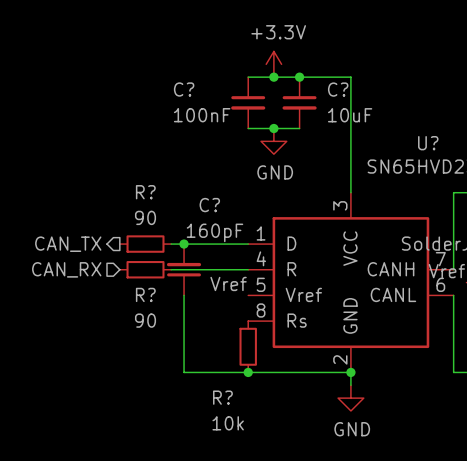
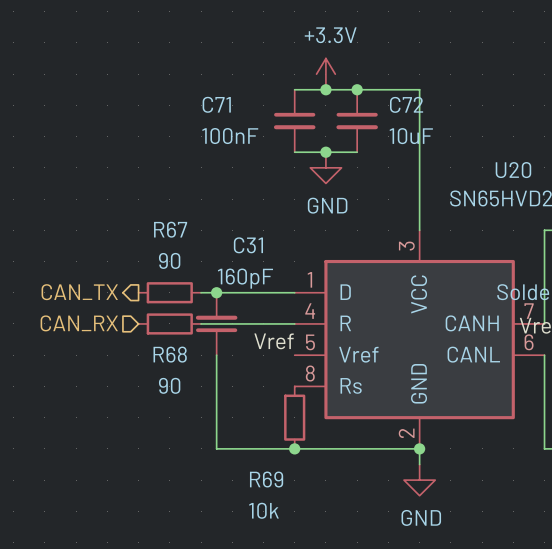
C? name: C? (184, 89) -> C71 (216, 104)
C? name: C? (338, 89) -> C72 (406, 104)
U? name: U? (428, 143) -> U20 (513, 170)
R? name: R? (145, 192) -> R67 (170, 229)
C? name: C? (209, 205) -> C31 (248, 245)
R? name: R? (145, 294) -> R68 (170, 354)
R? name: R? (222, 397) -> R69 (266, 479)

